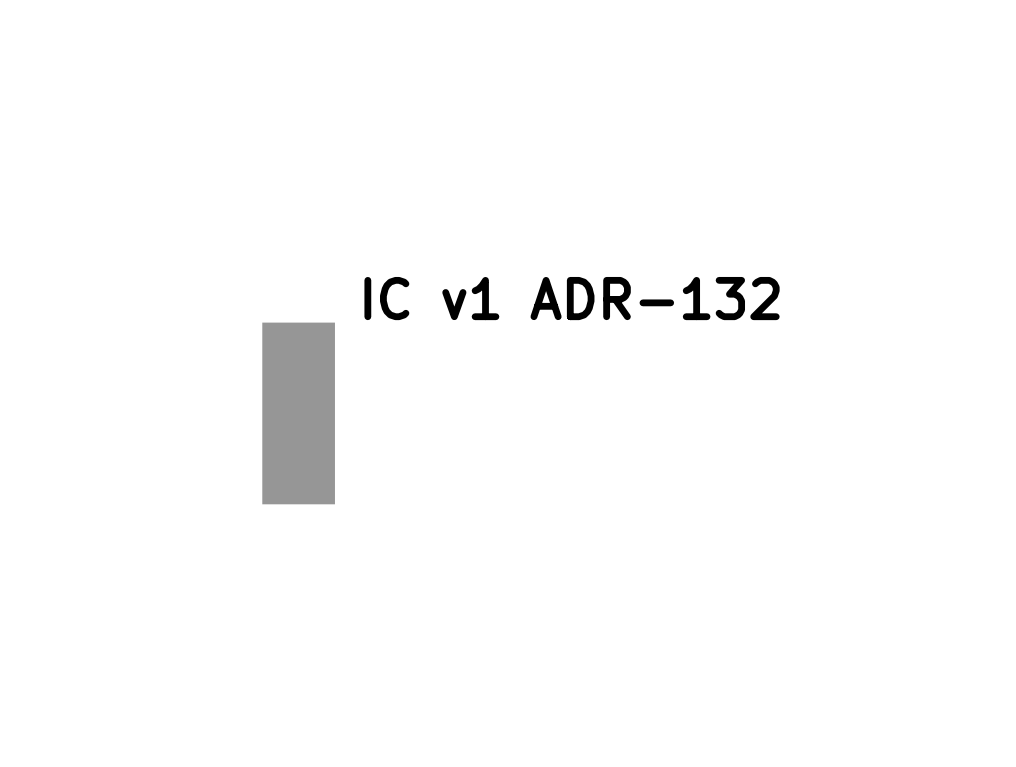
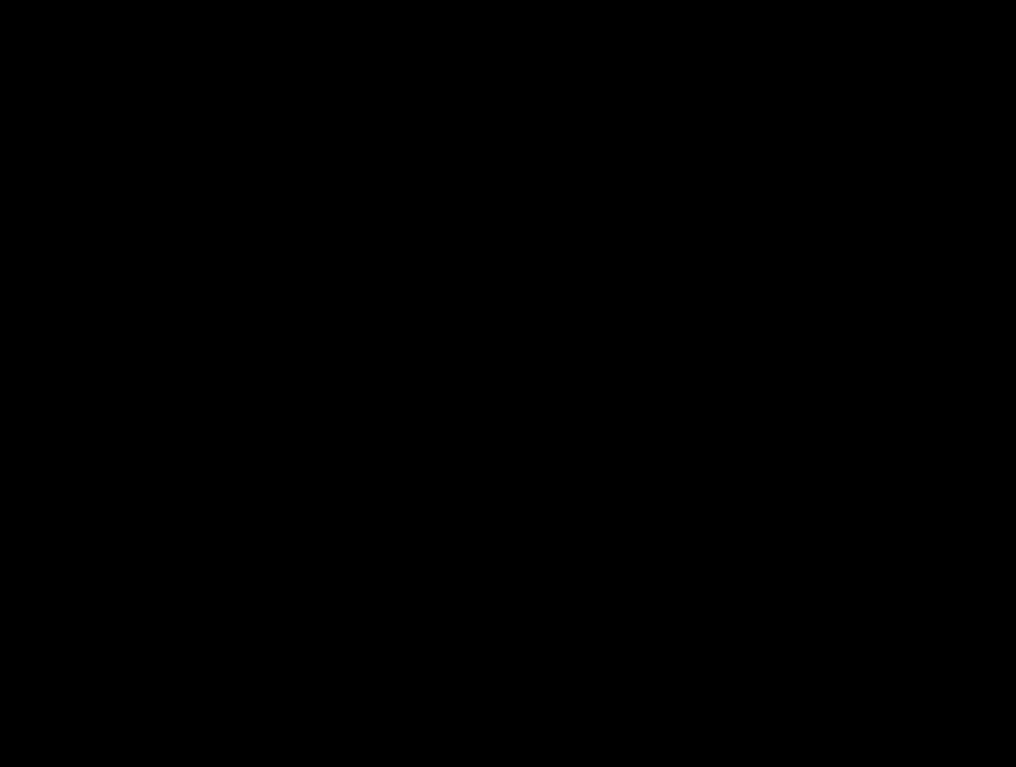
text: IC v1 ADR-132 (572, 298) -> none
part: (298, 413) -> none

